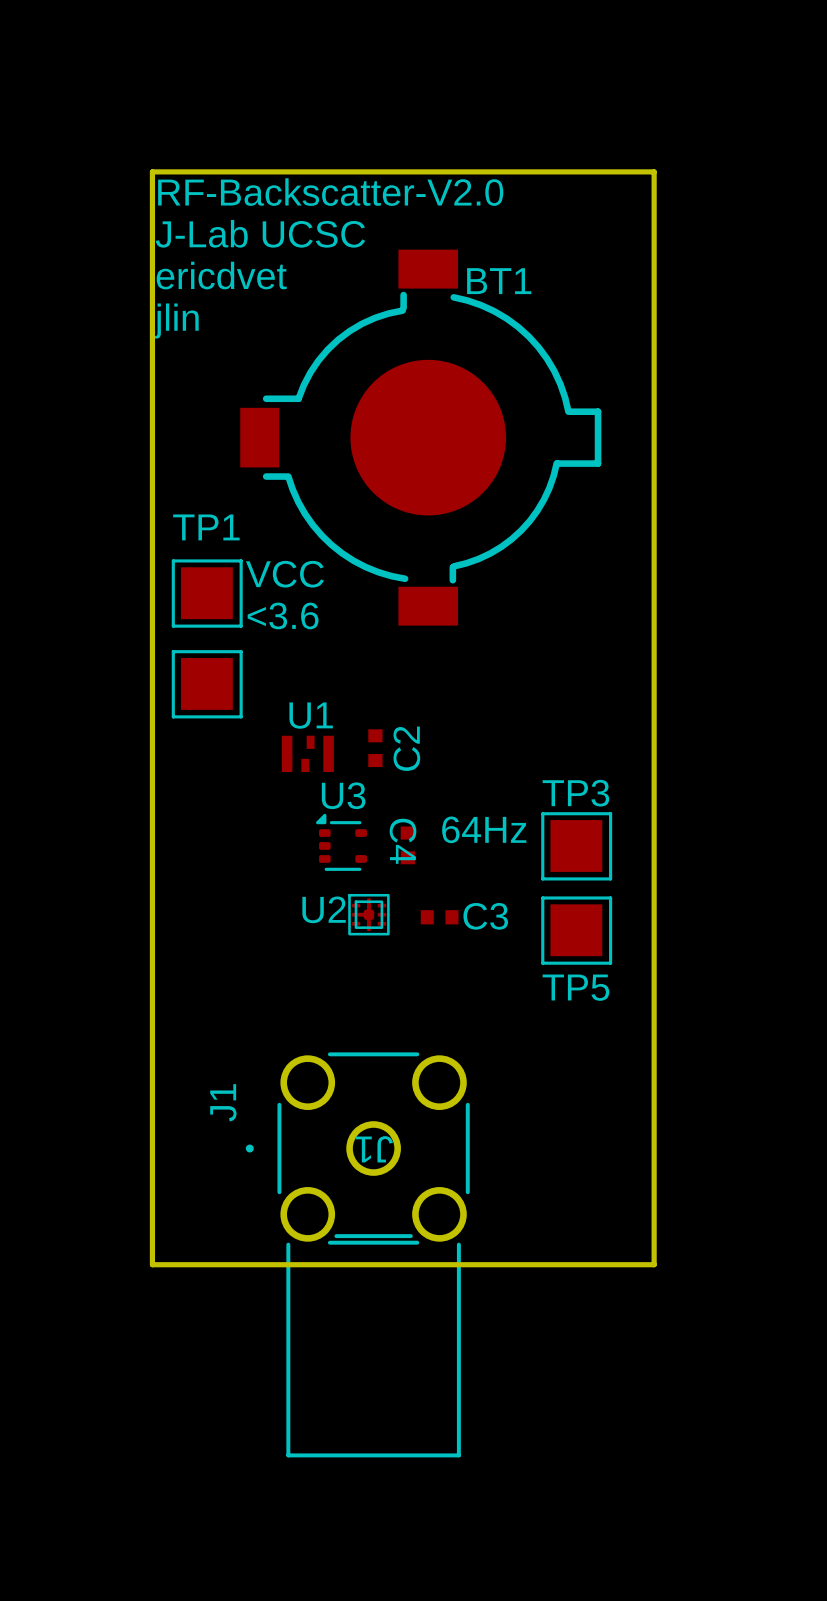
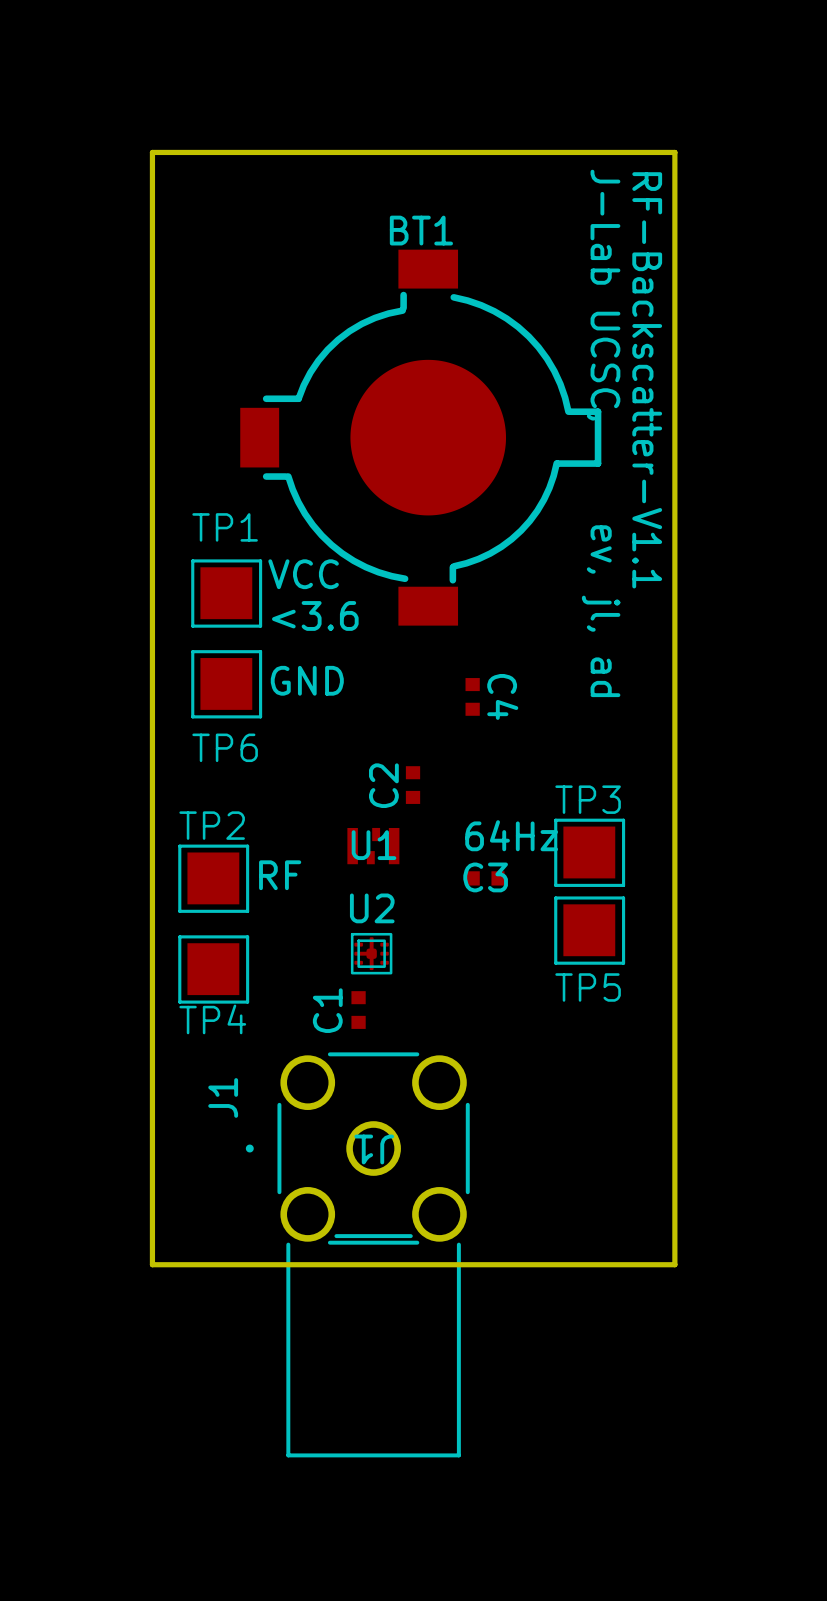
board edge: (152, 171) (654, 171) (654, 1264) -> (152, 171) (152, 152) (674, 152) (674, 1264) (654, 1264)
text: RF-Backscatter-V2.0 (330, 192) -> RF-Backscatter-V1.1 (647, 380)
text: J-Lab UCSC (260, 233) -> none
text: ericdvet (221, 275) -> none
BT1 name position: BT1 (499, 281) -> BT1 (421, 230)
text: jlin (176, 321) -> none
text: none -> J-Lab UCSC, ev, jl, ad (601, 433)
text position: VCC (284, 574) -> VCC (303, 574)
TP1 position: (207, 593) -> (226, 593)
text position: <3.6 (283, 615) -> <3.6 (315, 615)
text: none -> GND (307, 680)
TP6 position: (207, 684) -> (226, 684)
U1 name position: U1 (311, 715) -> U1 (374, 845)
TP6 name: none -> TP6 (225, 747)
C2 position: (375, 748) -> (413, 785)
C2 name position: C2 (406, 748) -> C2 (383, 785)
U1 position: (307, 753) -> (373, 846)
text position: 64Hz (484, 829) -> 64Hz (511, 835)
C4 name position: C4 (402, 841) -> C4 (502, 696)
U3: (341, 842) -> none
C4 position: (407, 845) -> (472, 696)
TP3 position: (576, 846) -> (589, 852)
text: none -> RF (280, 875)
TP2: none -> (213, 878)
U2 name position: U2 (324, 909) -> U2 (372, 908)
U2 position: (365, 914) -> (368, 953)
C3 name position: C3 (485, 916) -> C3 (485, 877)
C3 position: (439, 917) -> (485, 878)
TP5 position: (576, 930) -> (589, 930)
TP4: none -> (213, 969)
C1: none -> (358, 1010)

